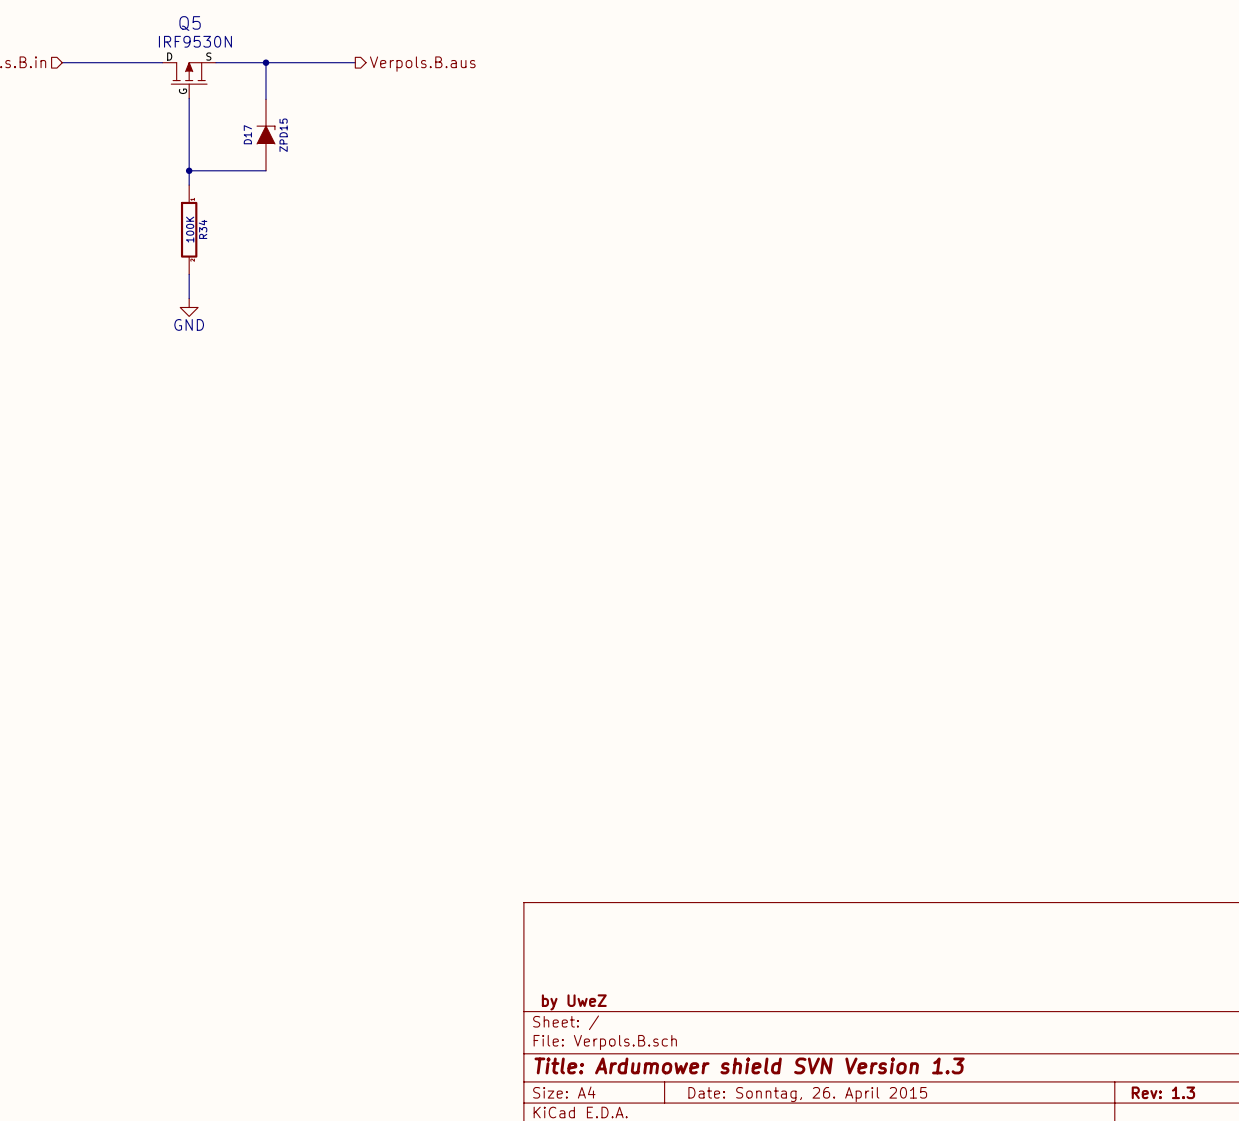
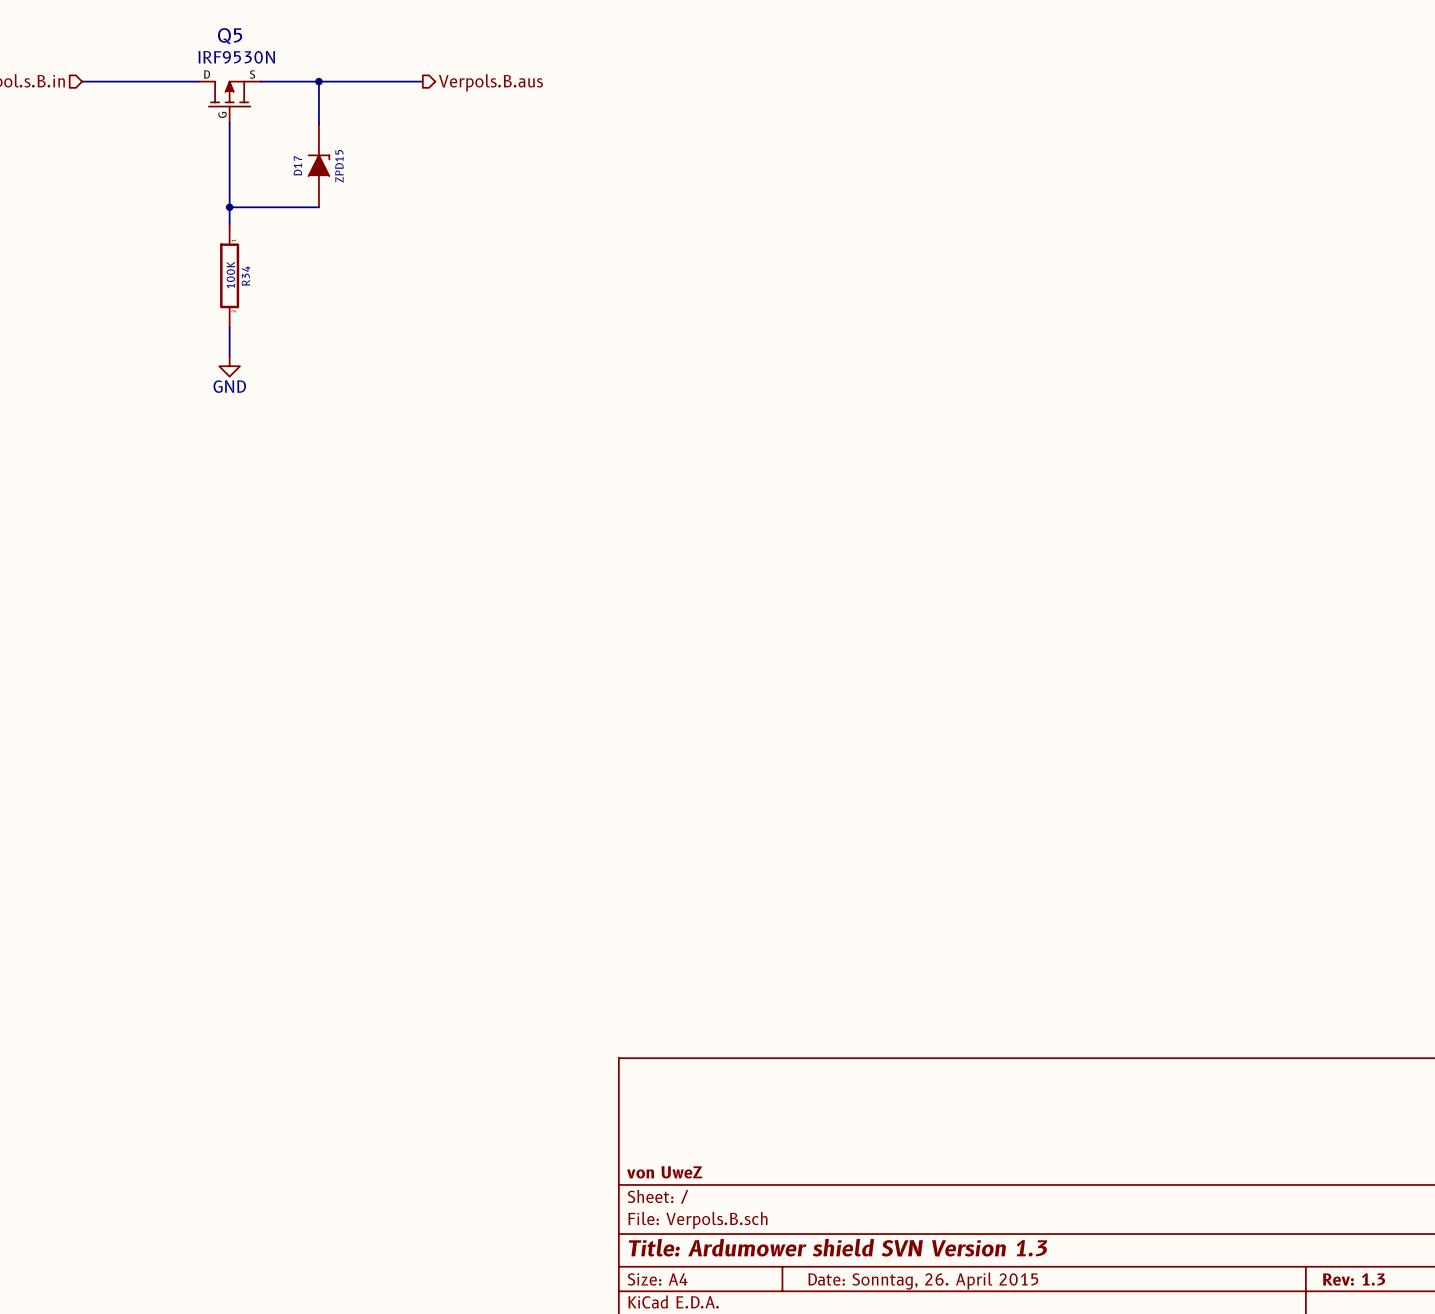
title block: by UweZ (574, 1002) -> von UweZ (664, 1172)

